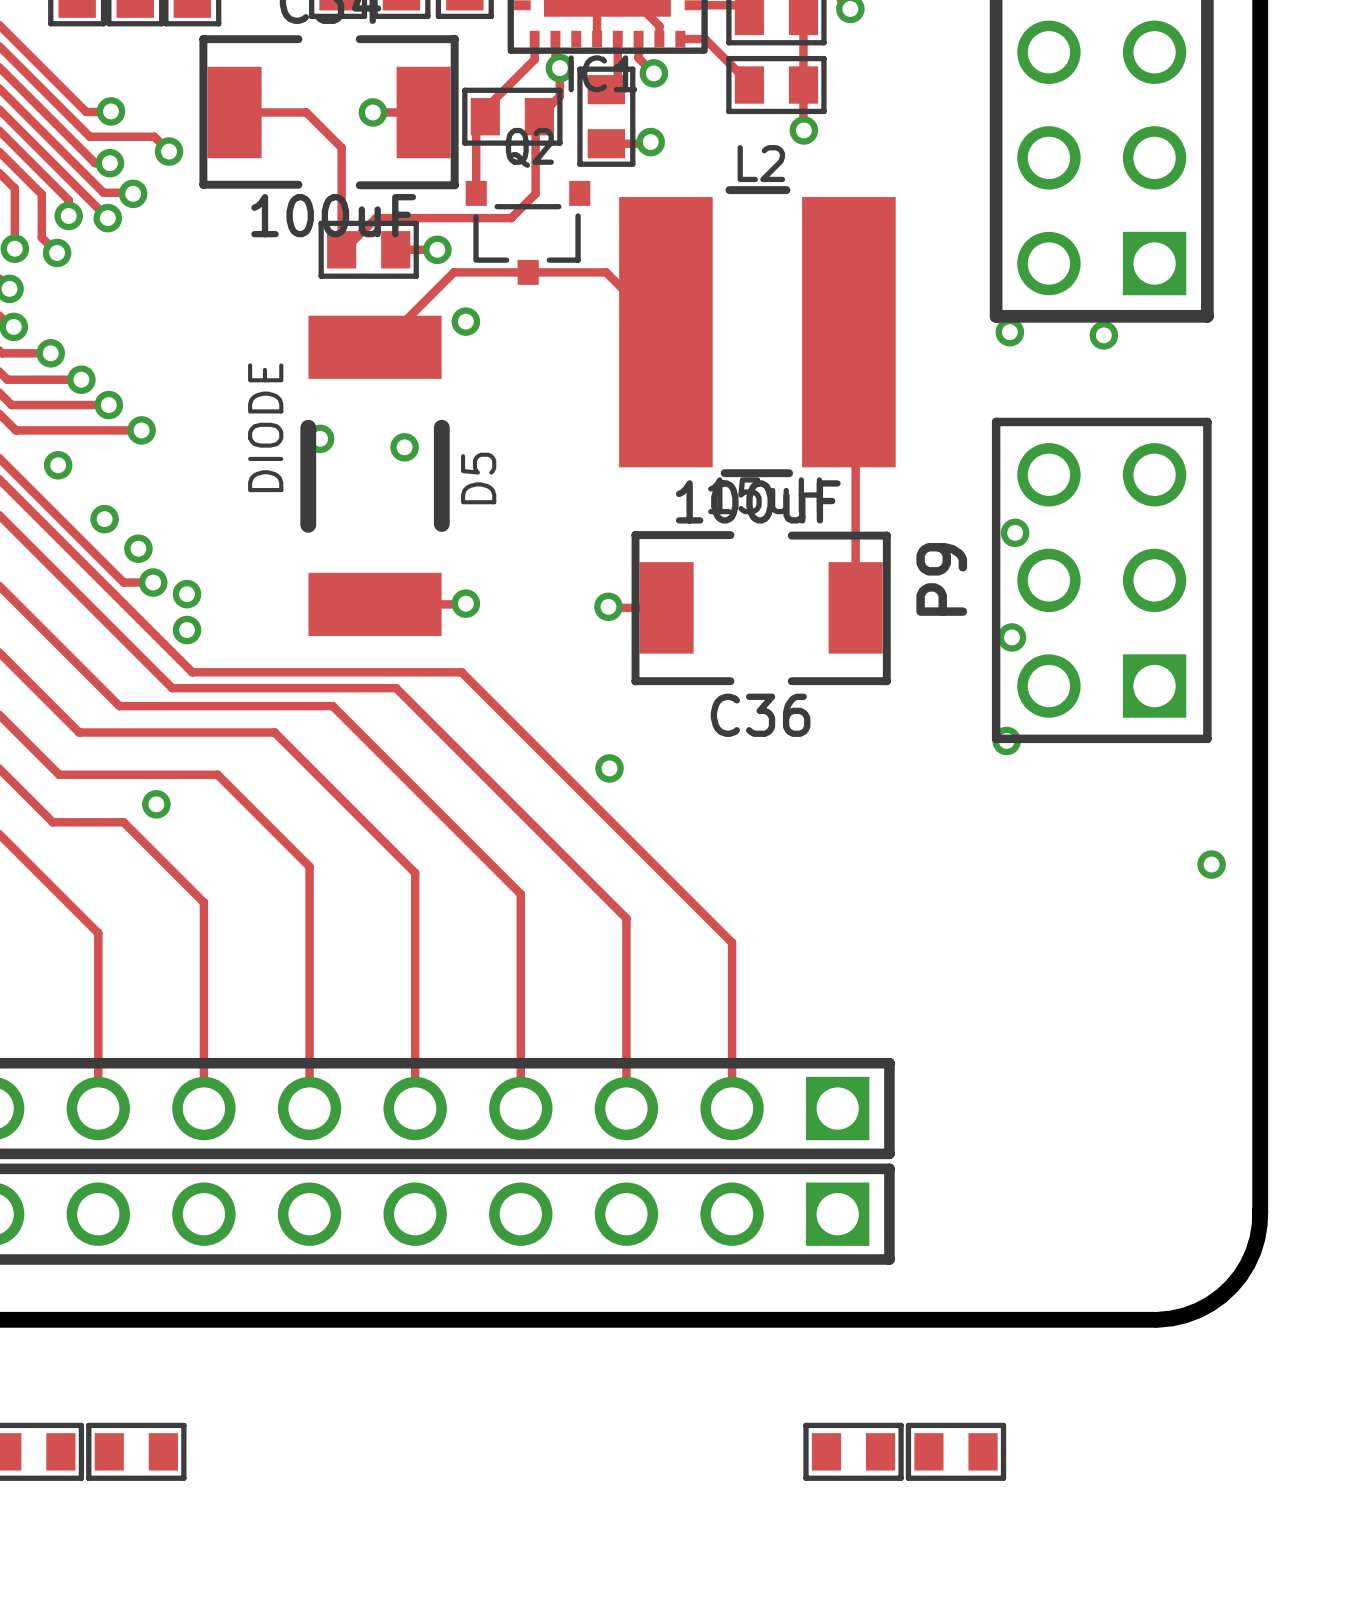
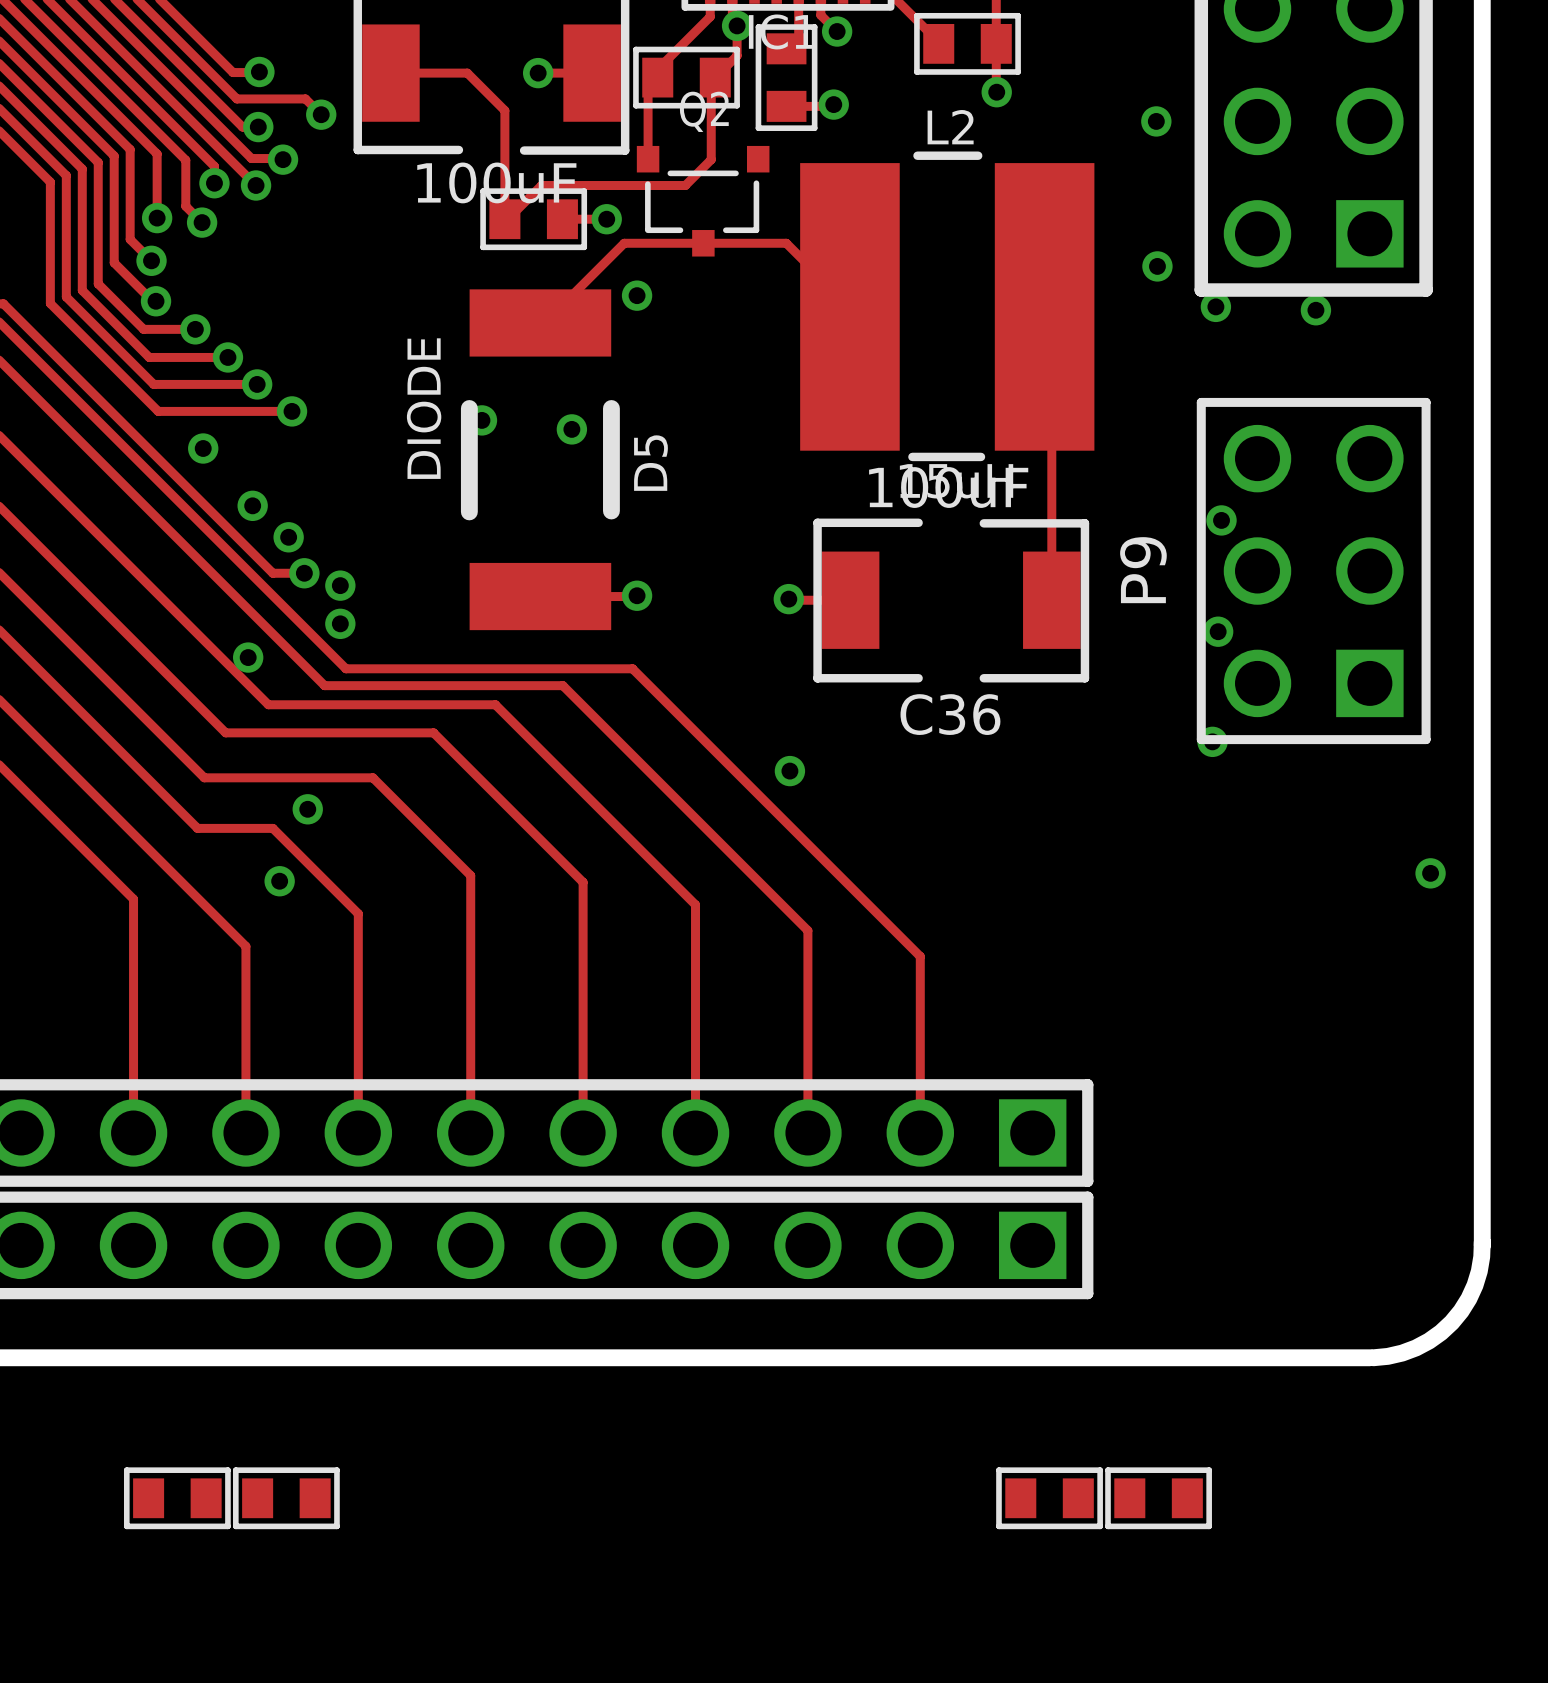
via: none -> (1156, 121)
via: none -> (1157, 266)
via: none -> (248, 657)
via: none -> (279, 881)

